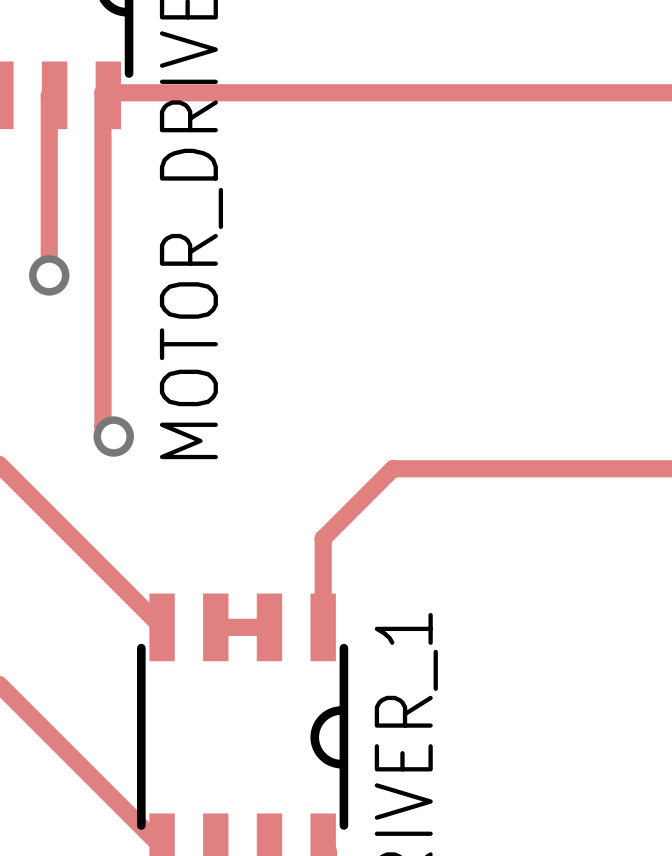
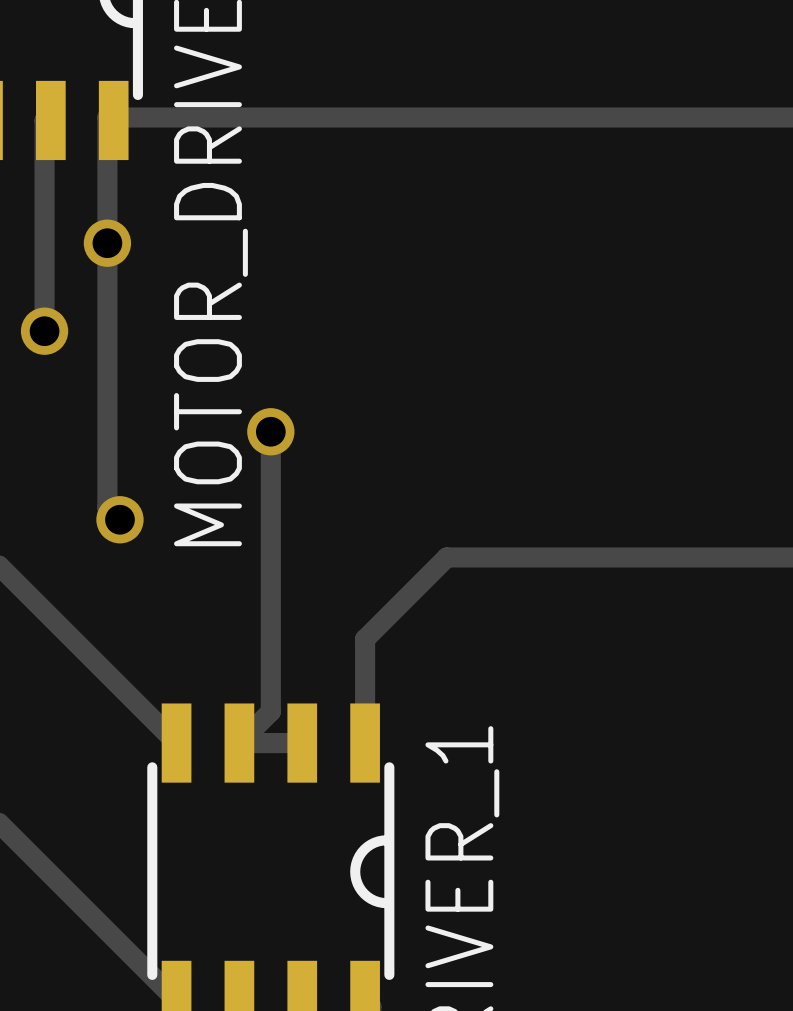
via: none -> (107, 243)
track: none -> (270, 431) (270, 711) (239, 743)
via: none -> (270, 431)

